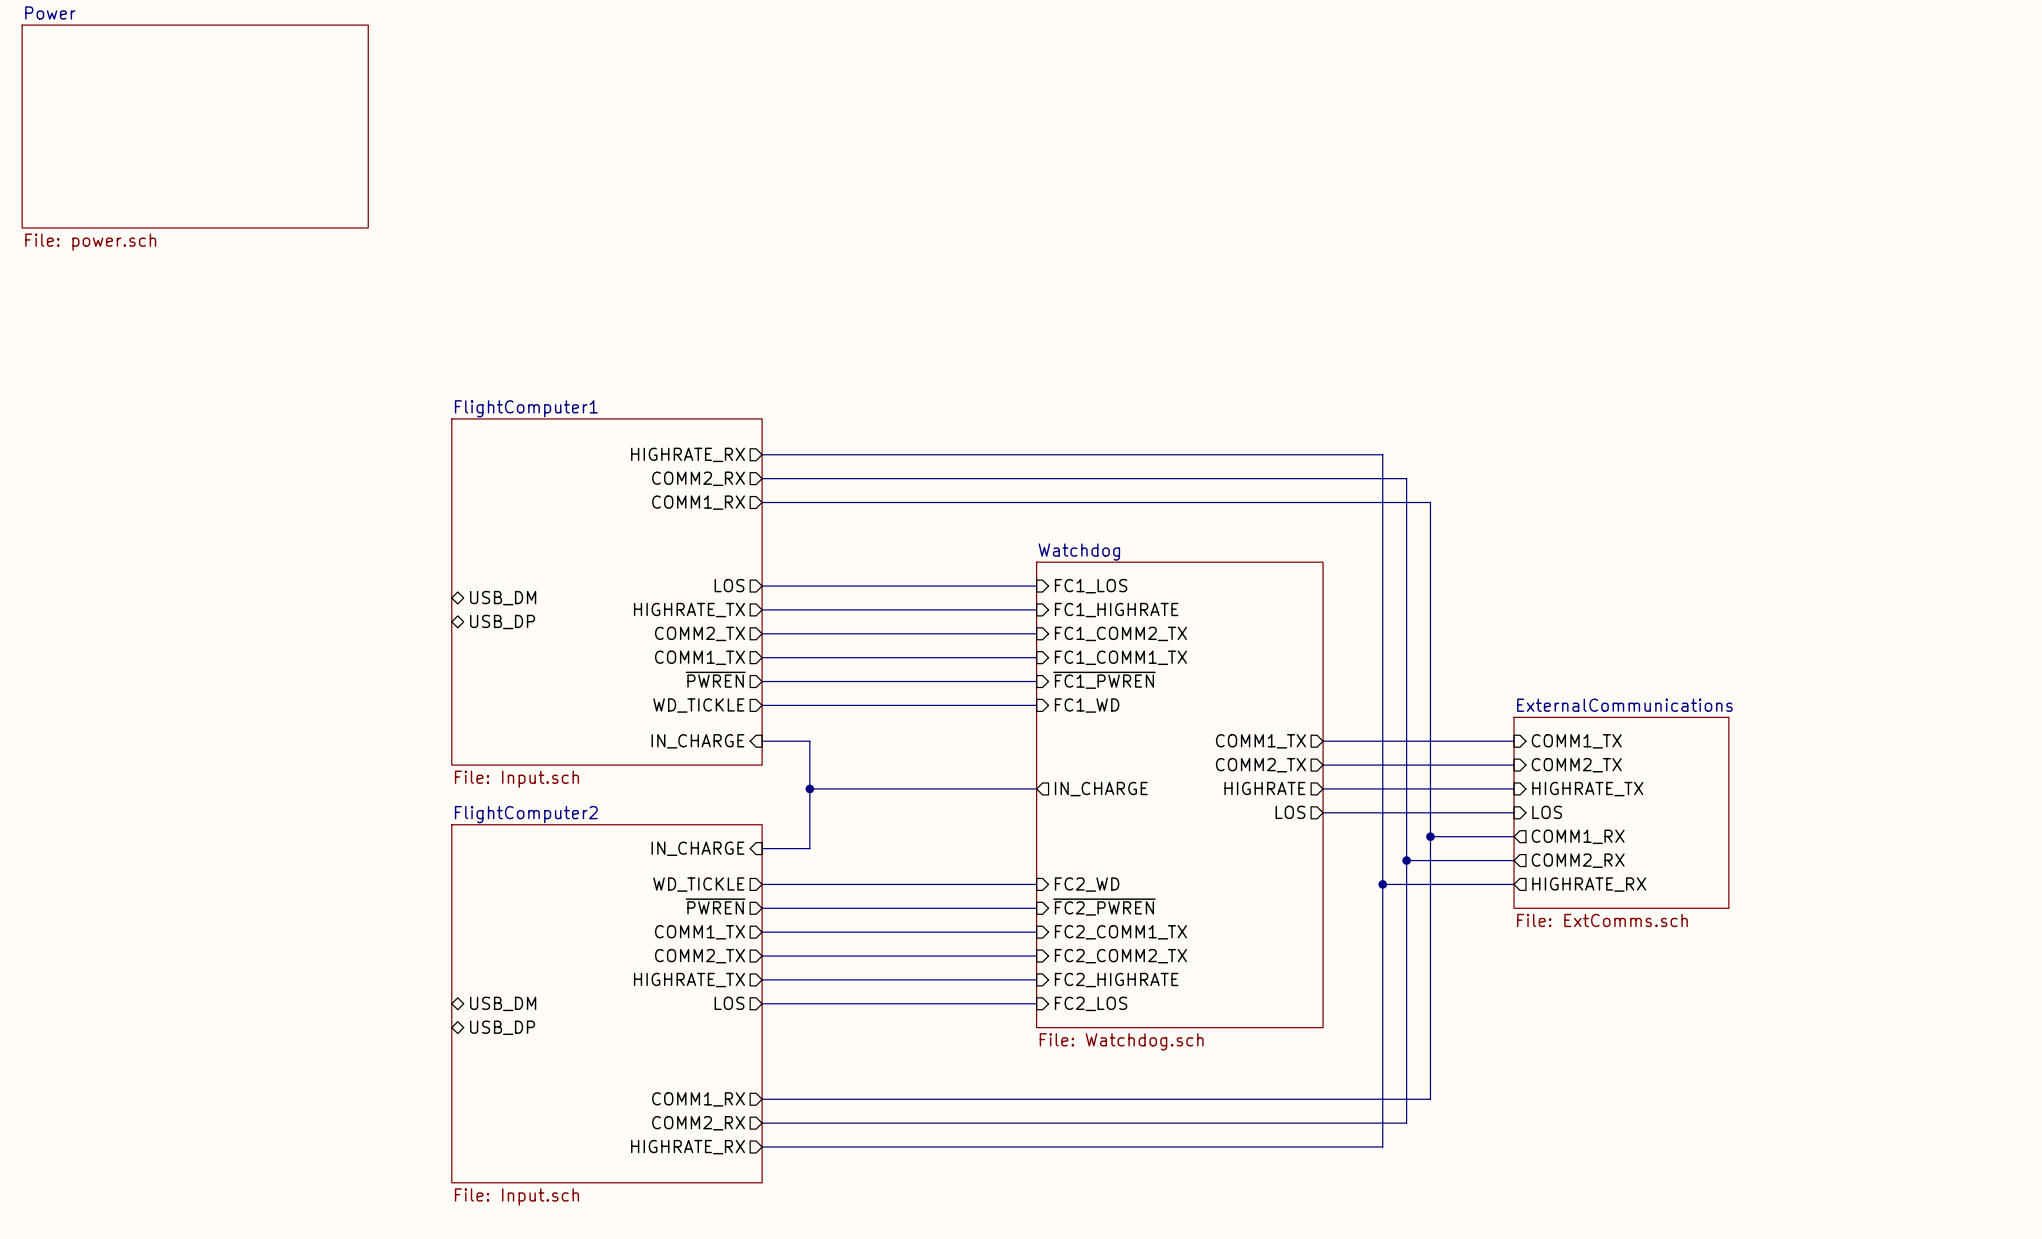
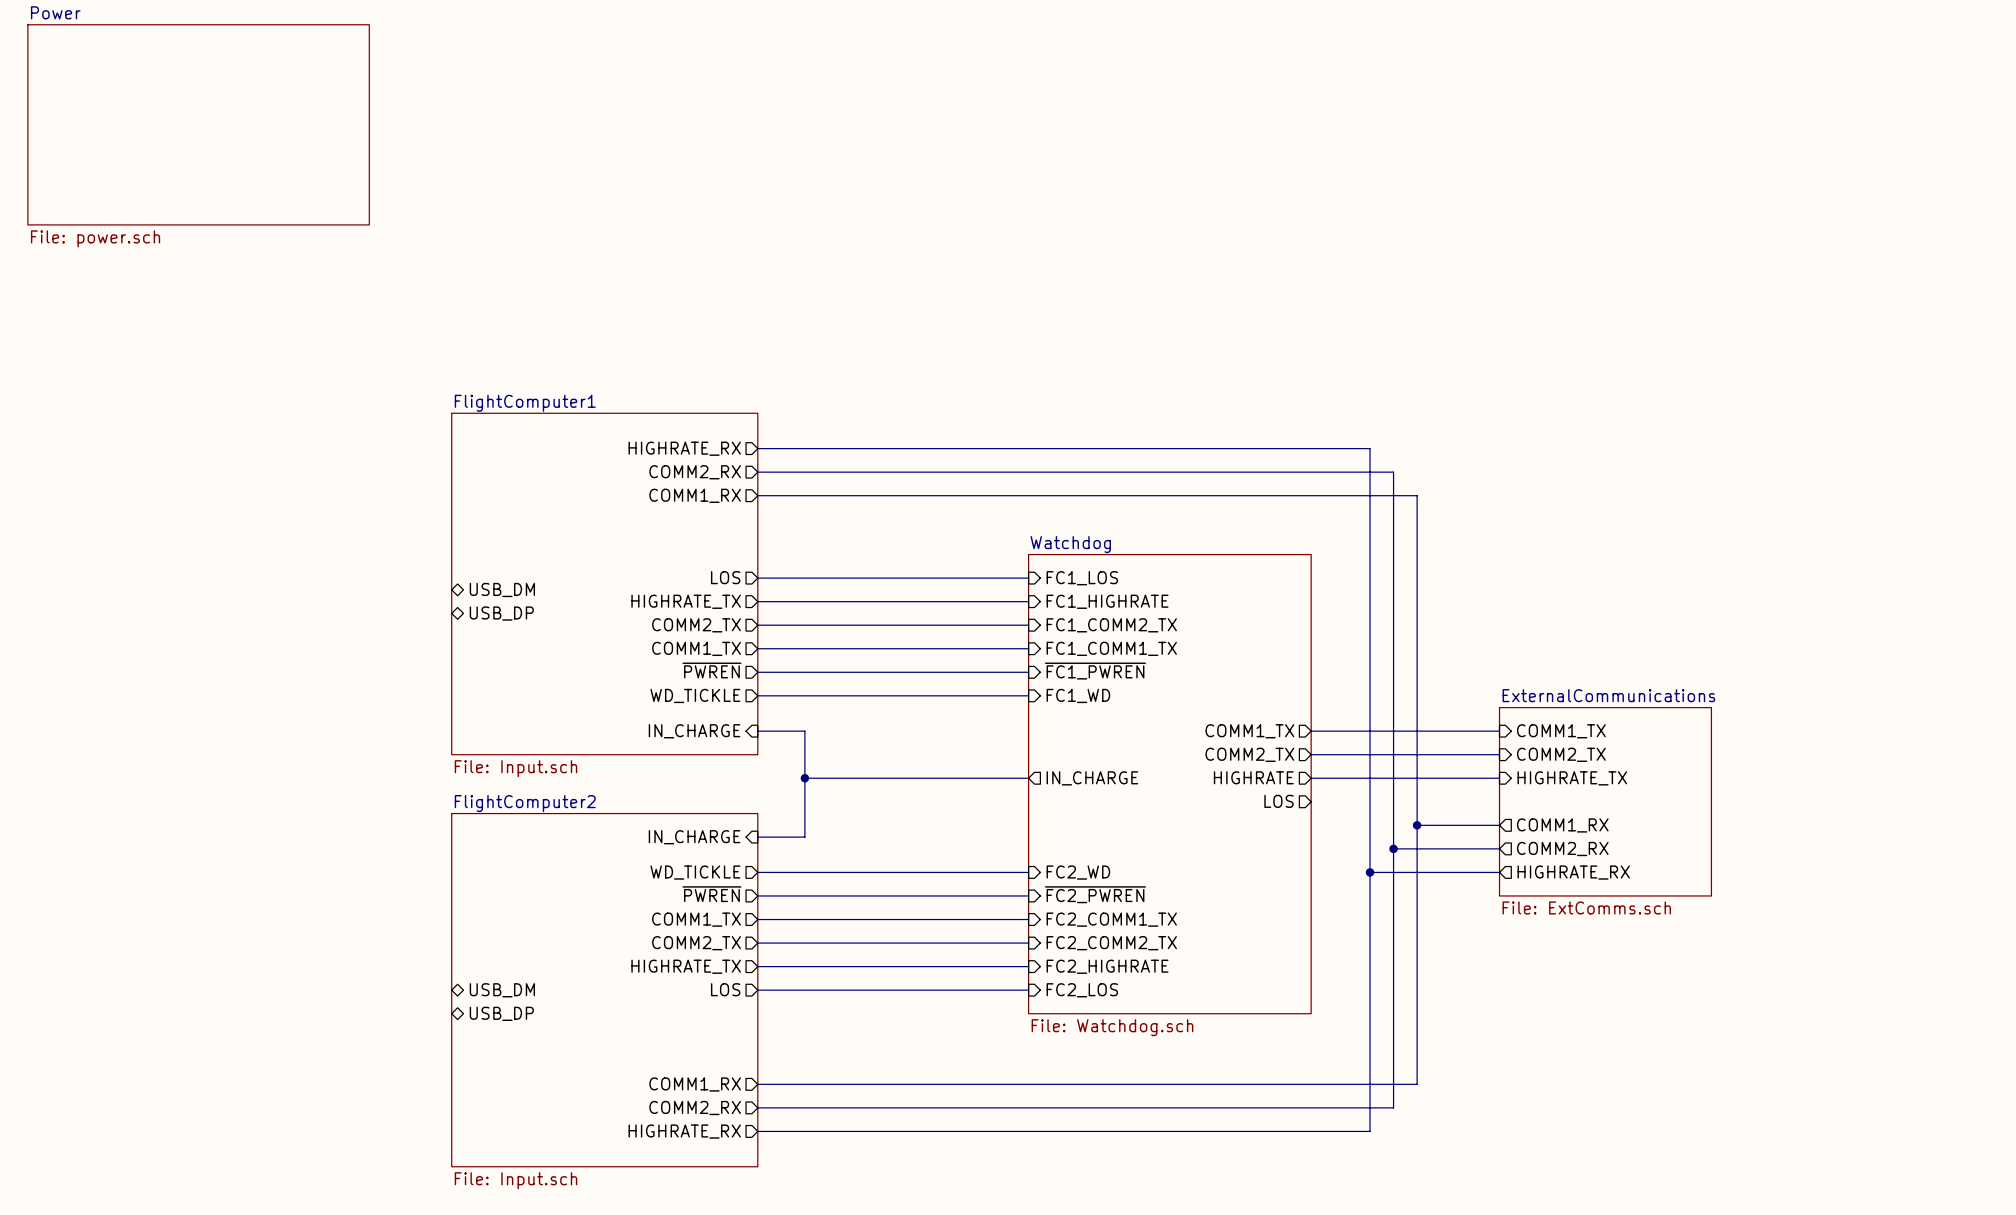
wire: (1323, 812) (1514, 812) -> none
sheet pin: LOS (1547, 812) -> none

